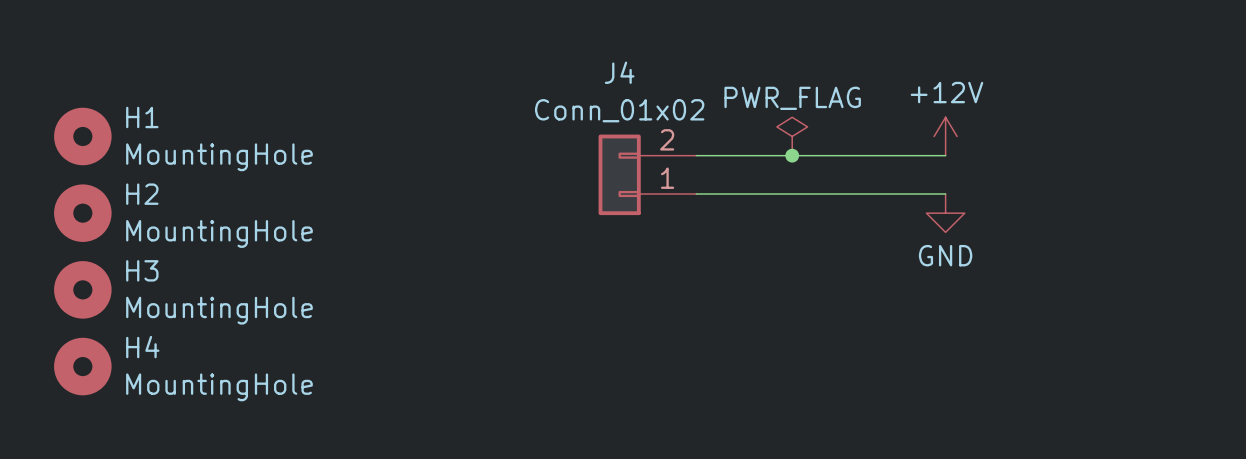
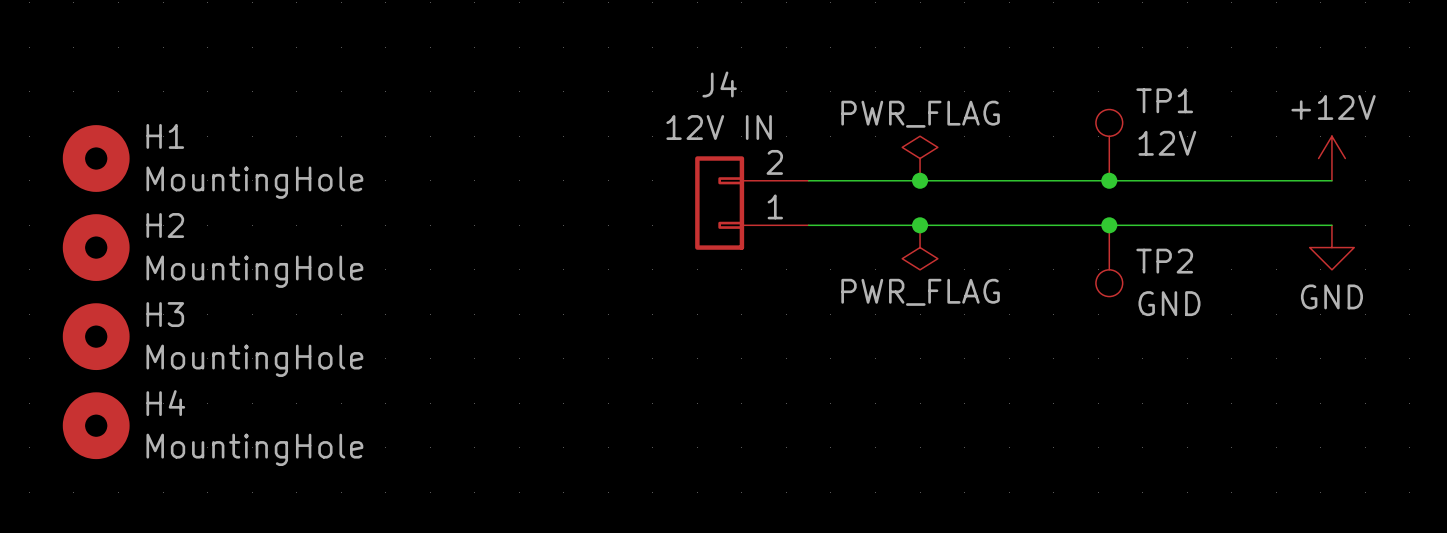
J4 value: Conn_01x02 (619, 110) -> 12V IN (719, 127)
TP1: none -> 12V (1109, 145)
power symbol position: +12V (945, 136) -> +12V (1331, 158)
wire: none -> (1098, 180) (1331, 180)
junction: none -> (1109, 180)
junction: none -> (920, 225)
wire: none -> (1098, 225) (1331, 225)
junction: none -> (1109, 225)
power symbol: none -> PWR_FLAG (920, 247)
power symbol position: GND (945, 213) -> GND (1331, 247)
TP2: none -> GND (1109, 260)

